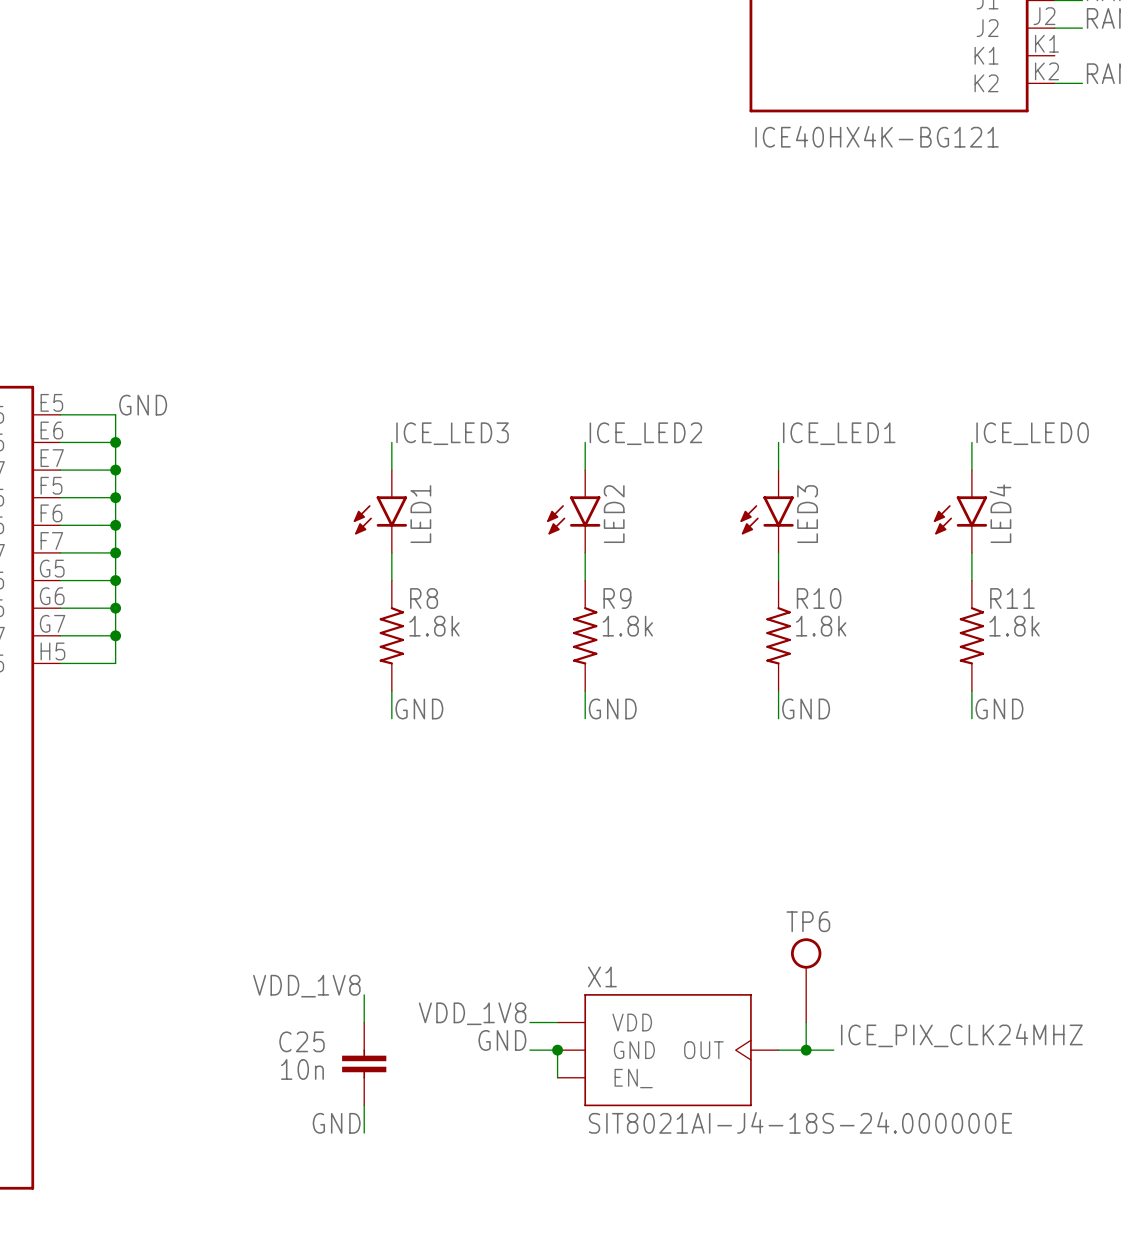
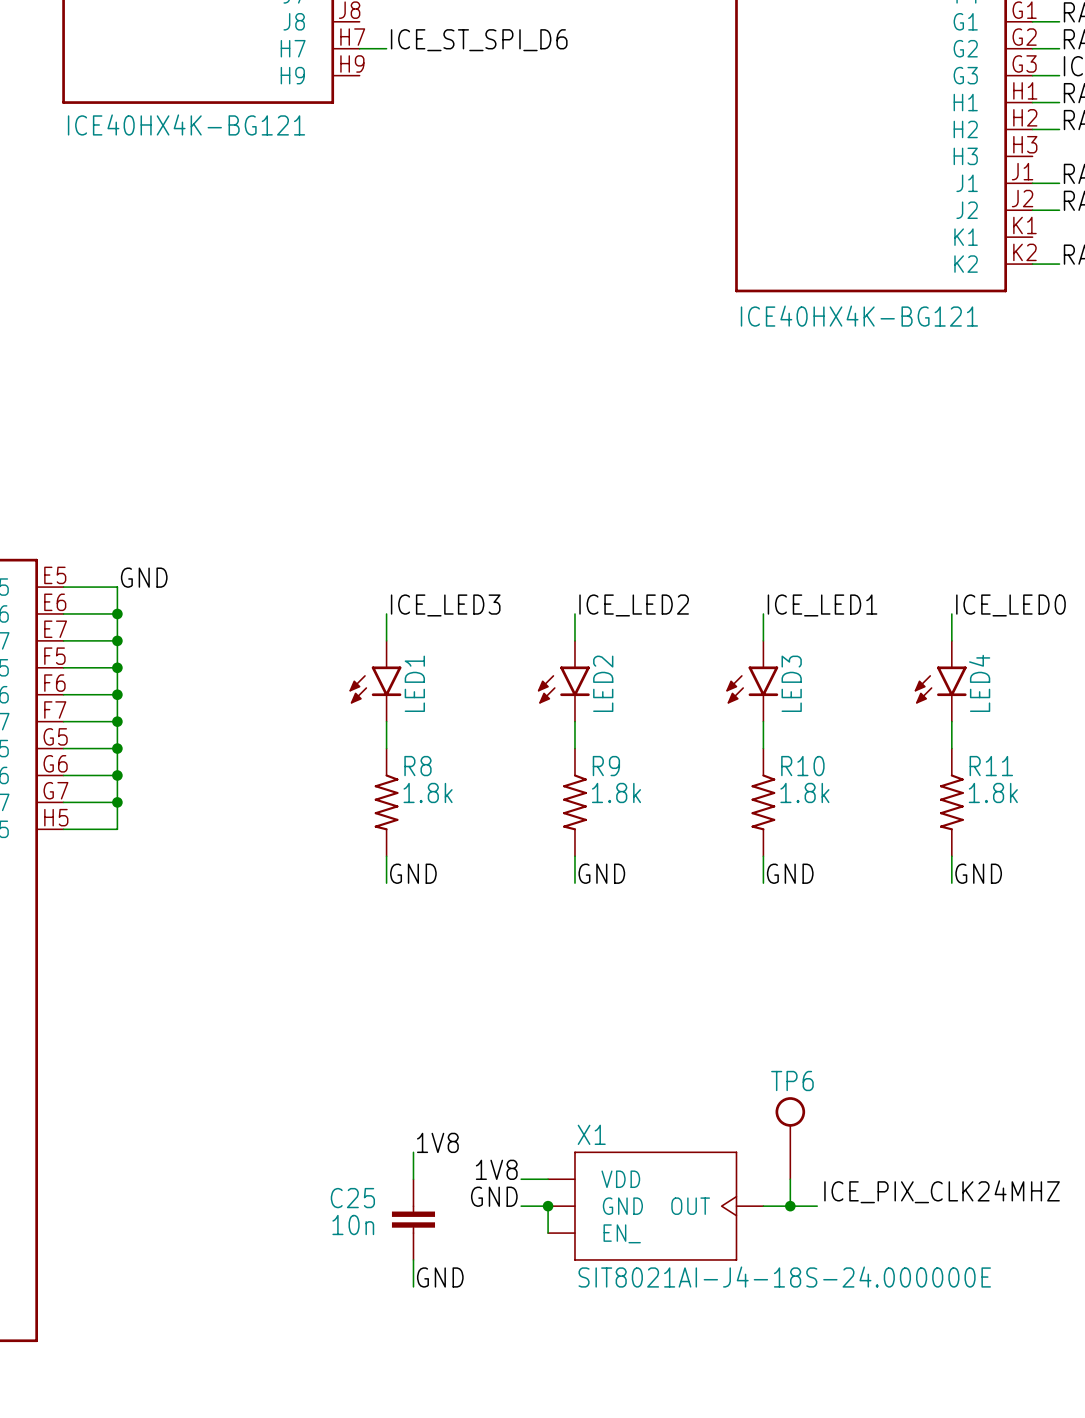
label: none -> 1V8 (437, 1142)
label: VDD_1V8 (306, 986) -> none
wire: (364, 994) (364, 1022) -> (413, 1152) (413, 1179)
label: VDD_1V8 (472, 1013) -> 1V8 (496, 1169)
C25 position: (364, 1063) -> (413, 1219)
wire: (364, 1105) (364, 1133) -> (413, 1259) (413, 1286)
label position: GND (336, 1123) -> GND (440, 1277)

